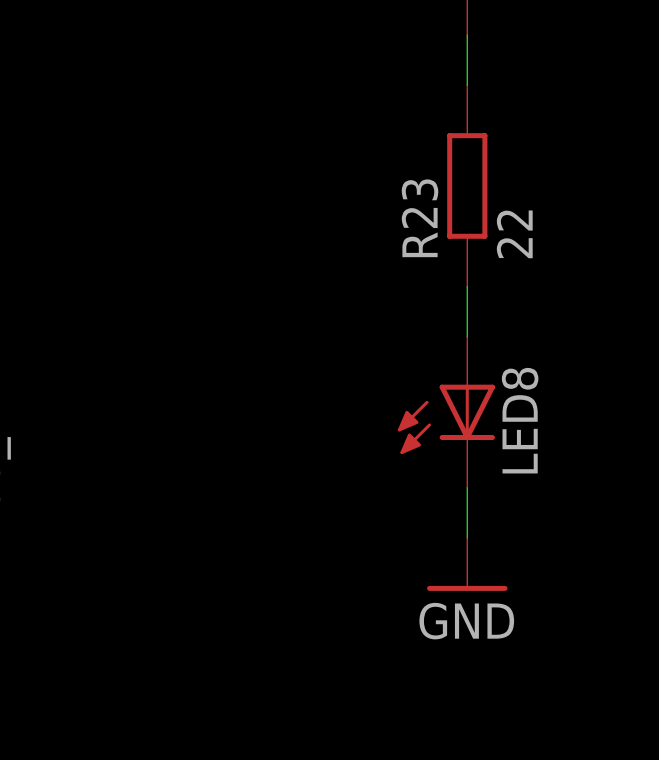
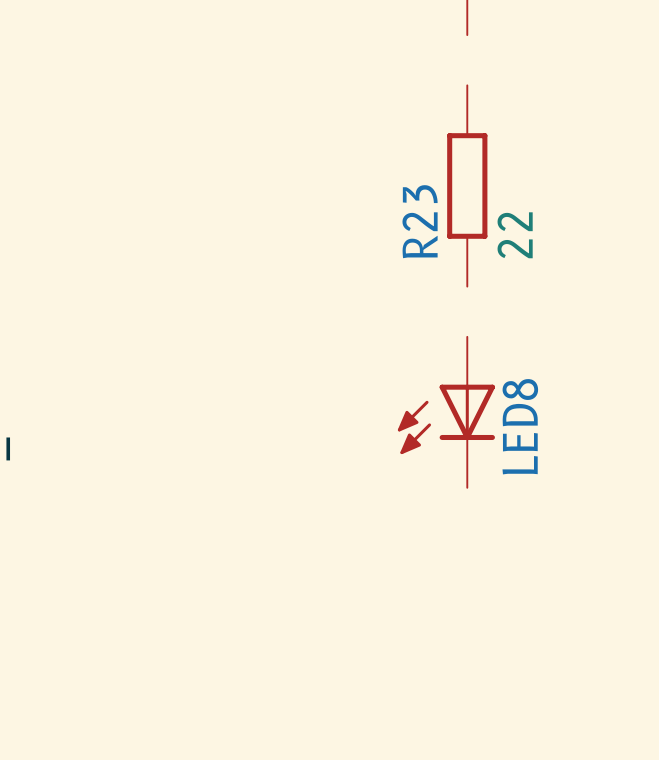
wire: (467, 35) (467, 85) -> none
wire: (467, 286) (467, 336) -> none
wire: (467, 487) (467, 538) -> none
power symbol: GND (467, 564) -> none

